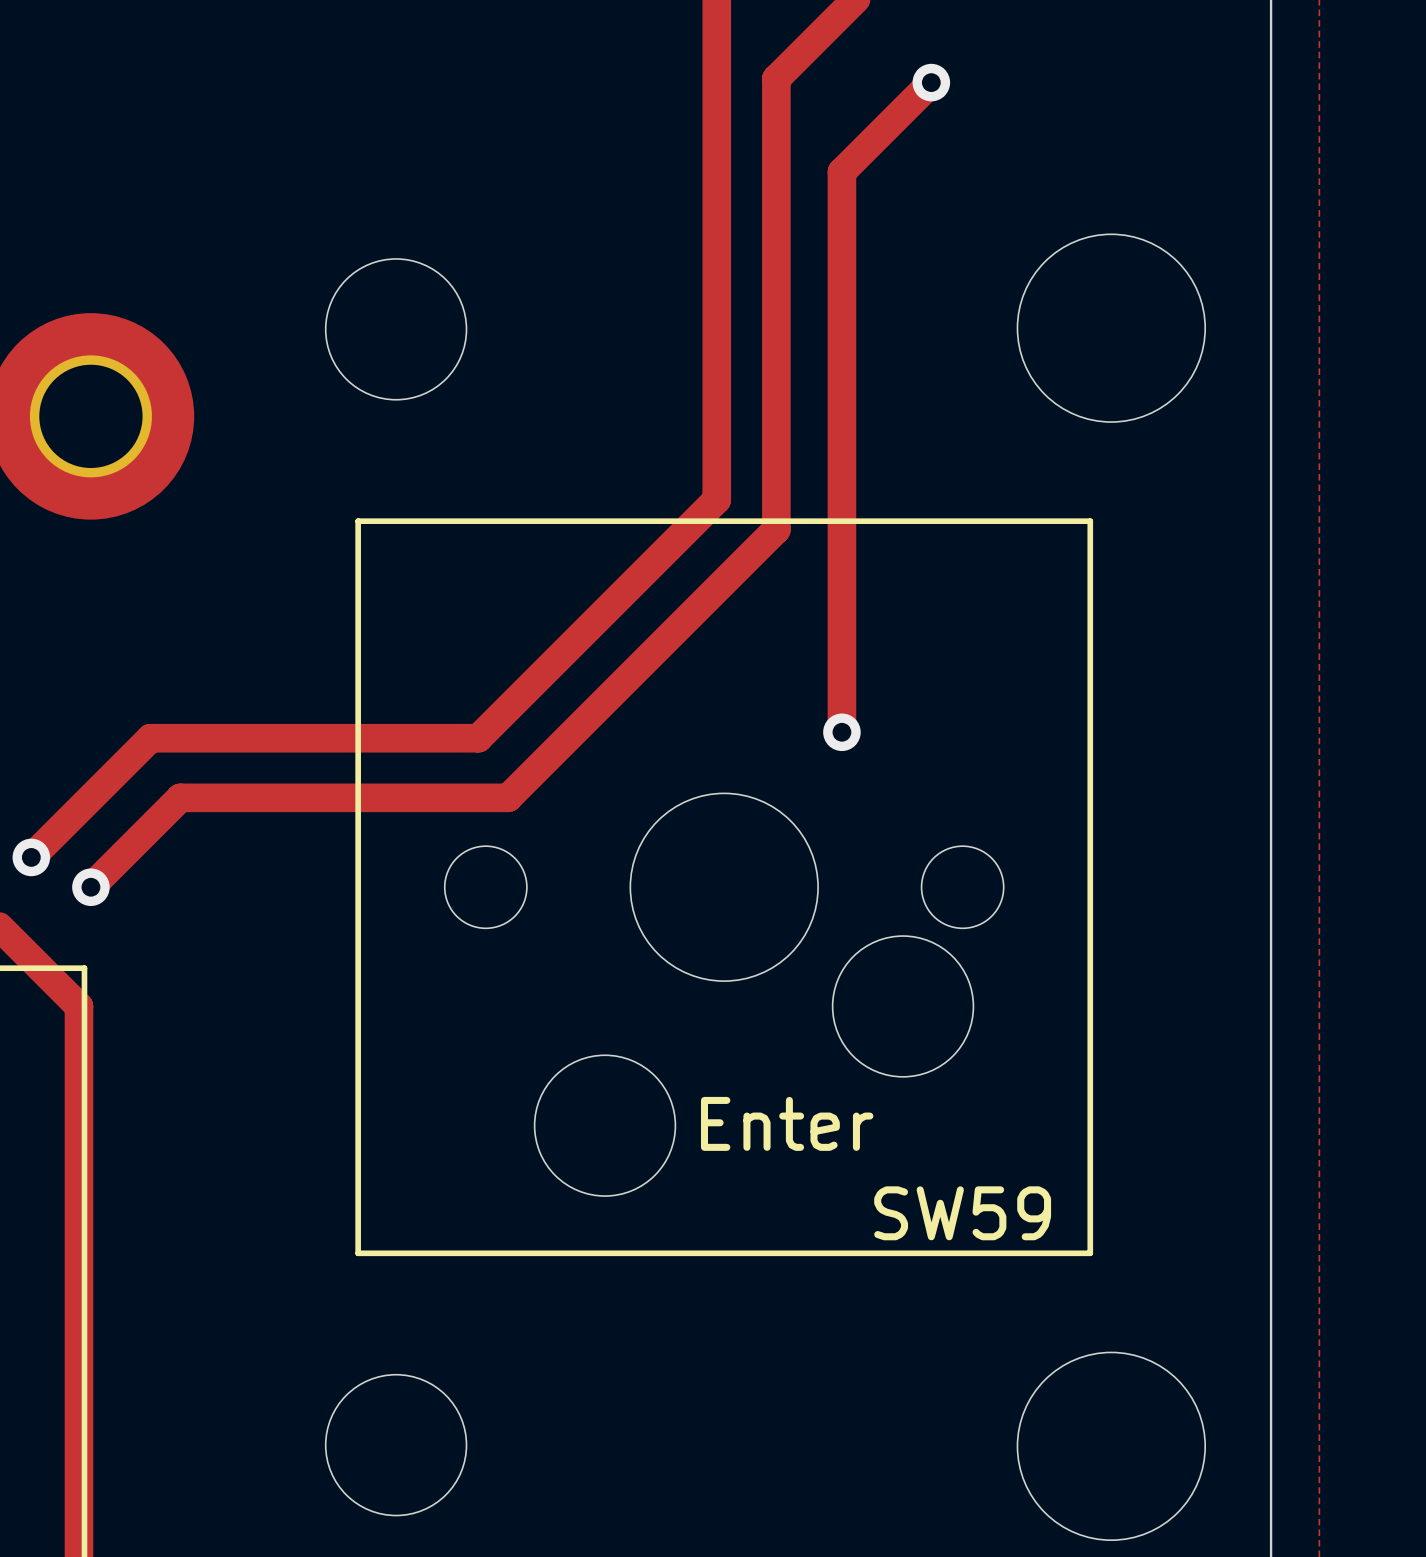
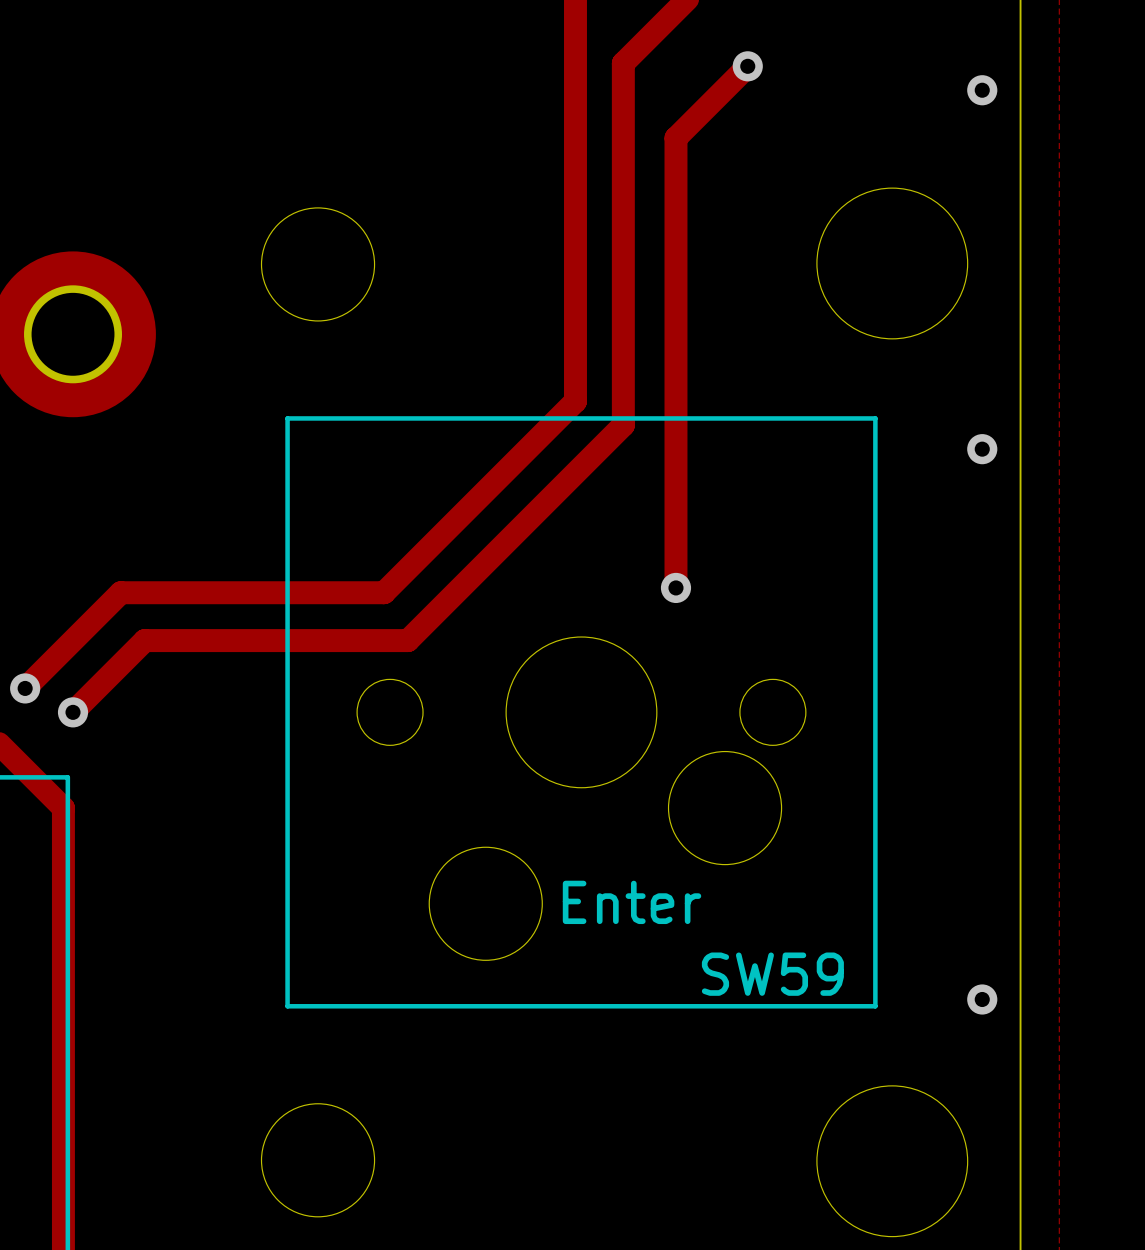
via: none -> (982, 90)
via: none -> (982, 449)
via: none -> (982, 999)

